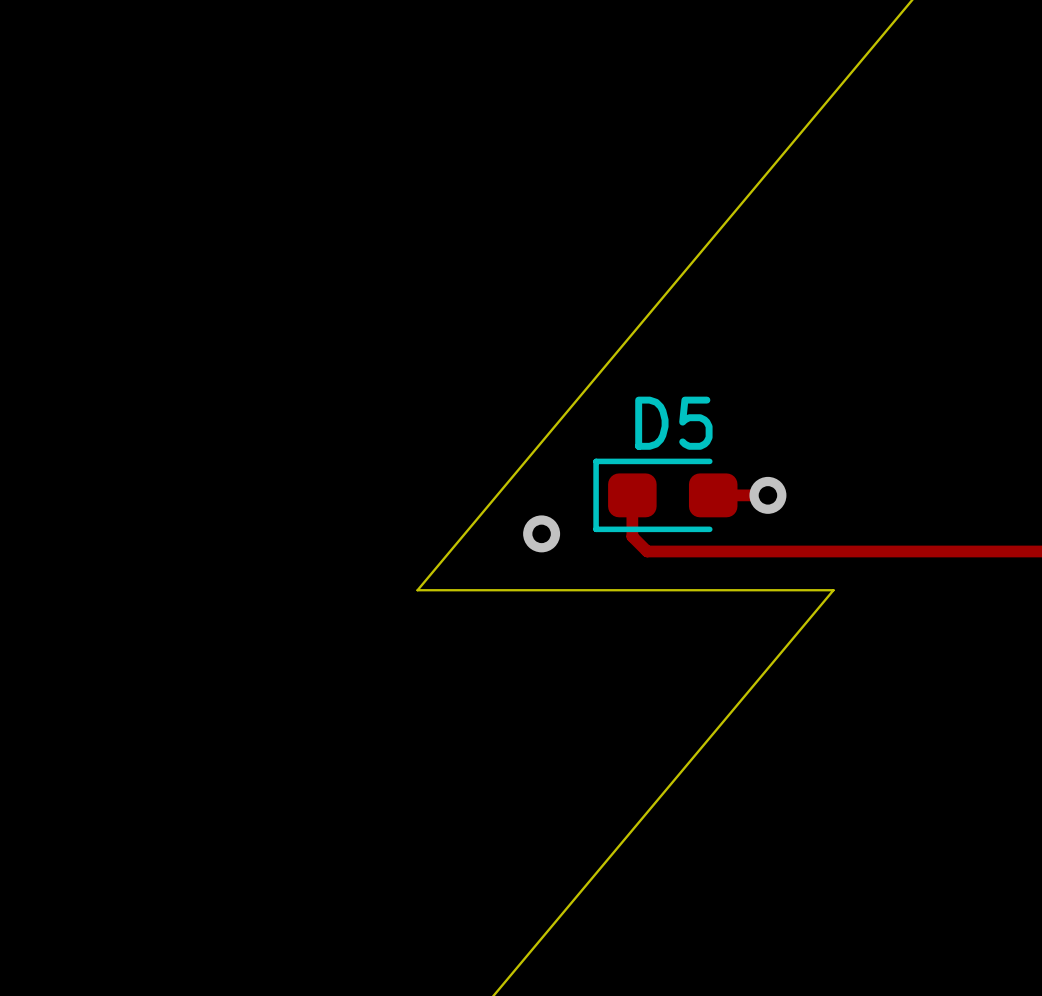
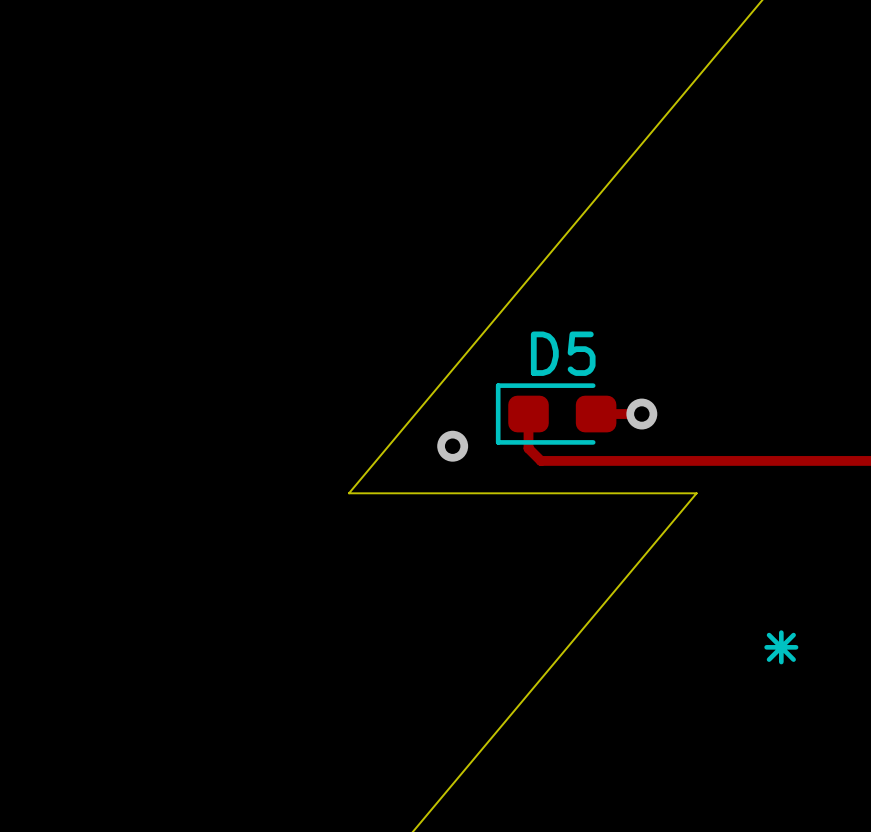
line: none -> (781, 632) (781, 662)
line: none -> (769, 635) (793, 659)
line: none -> (793, 635) (769, 659)
line: none -> (766, 647) (796, 647)

